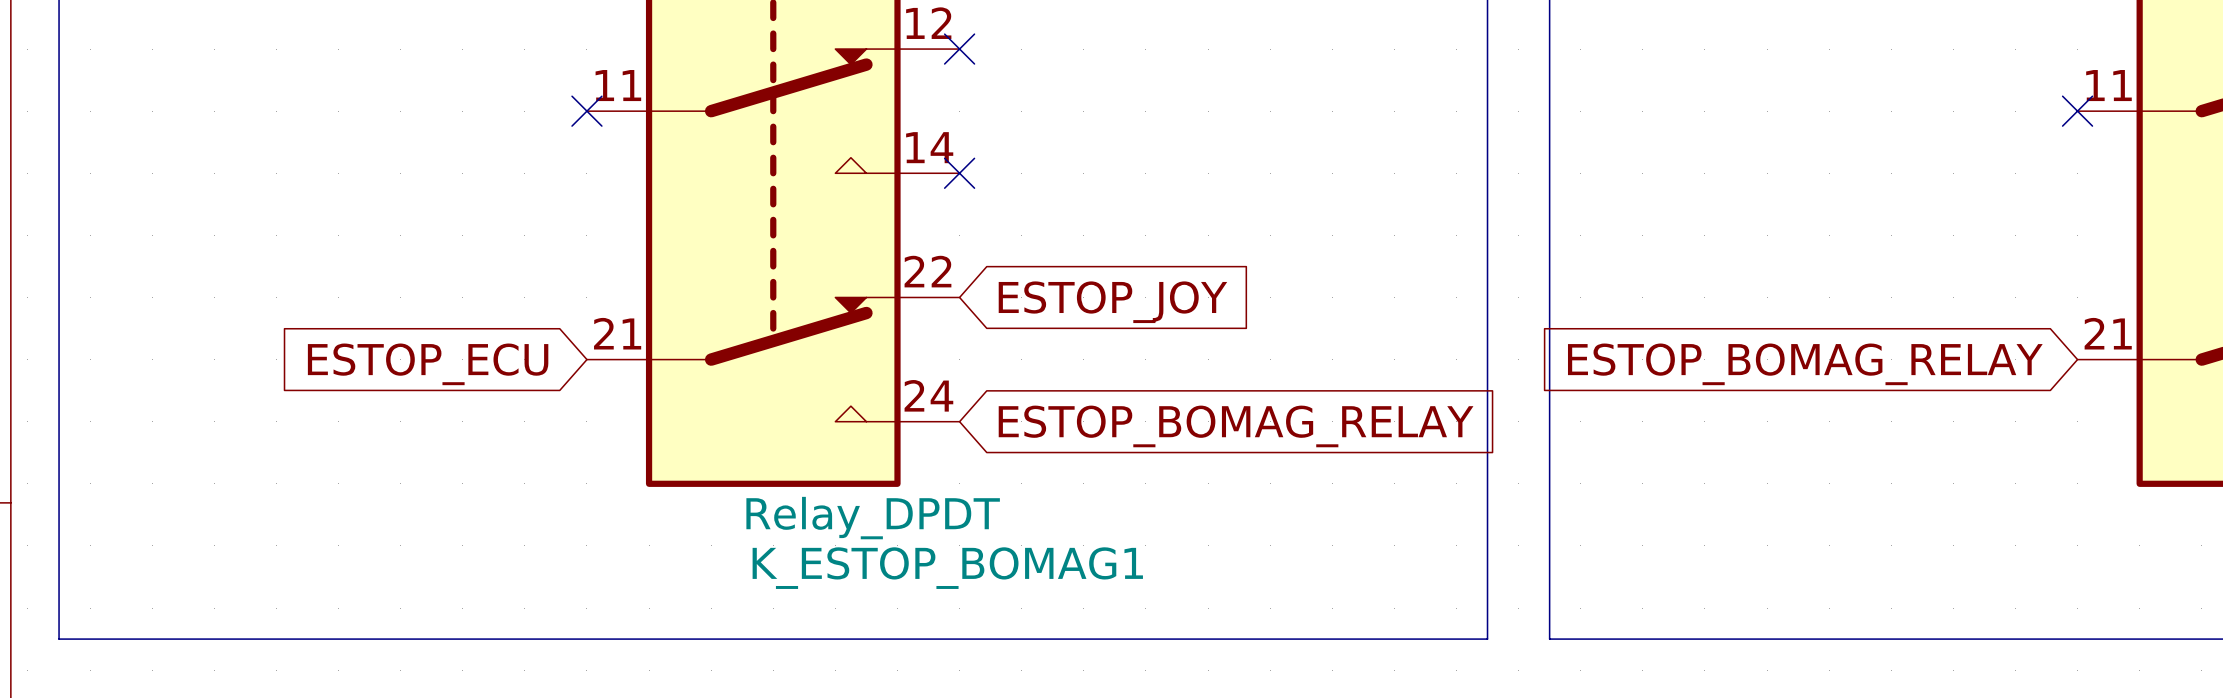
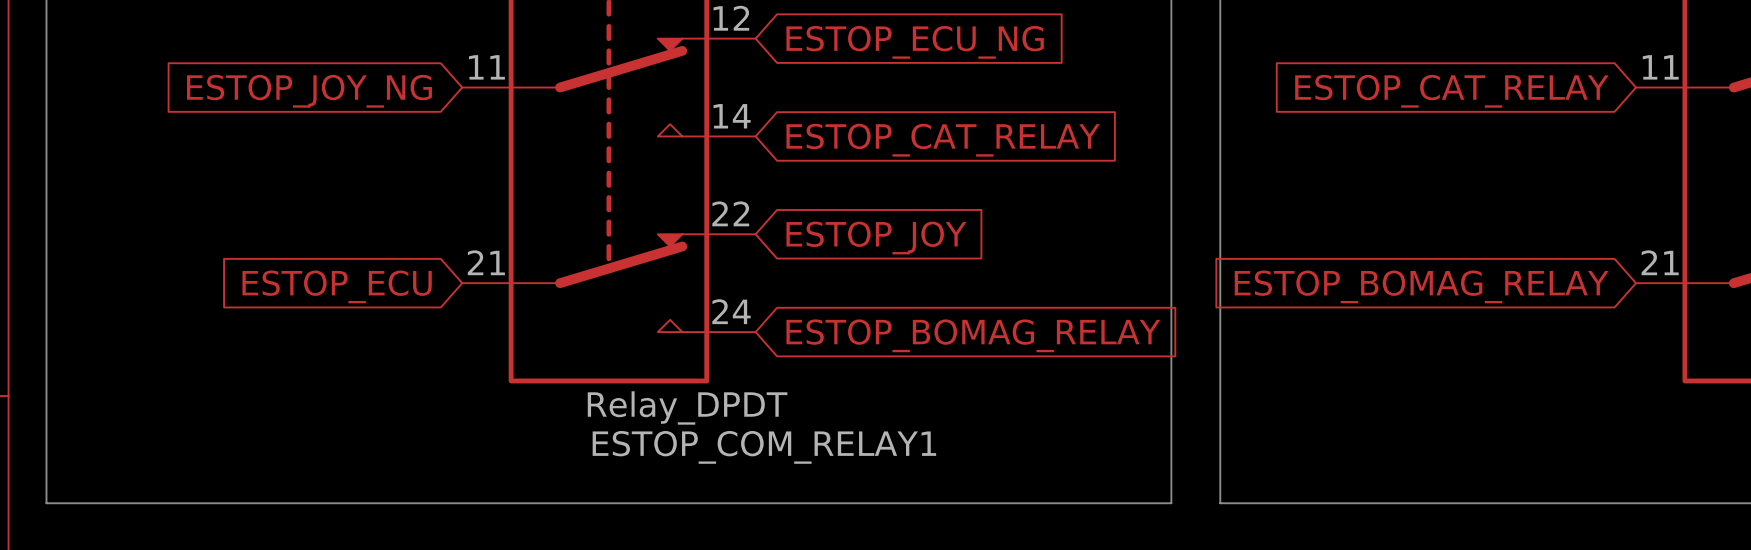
no-connect mark: (959, 49) -> none
global label: none -> ESTOP_ECU_NG (915, 42)
no-connect mark: (586, 111) -> none
no-connect mark: (2077, 111) -> none
global label: none -> ESTOP_JOY_NG (309, 91)
global label: none -> ESTOP_CAT_RELAY (1451, 91)
no-connect mark: (959, 173) -> none
global label: none -> ESTOP_CAT_RELAY (943, 140)
K_ESTOP_BOMAG1 name: K_ESTOP_BOMAG1 (947, 568) -> ESTOP_COM_RELAY1 (764, 447)

